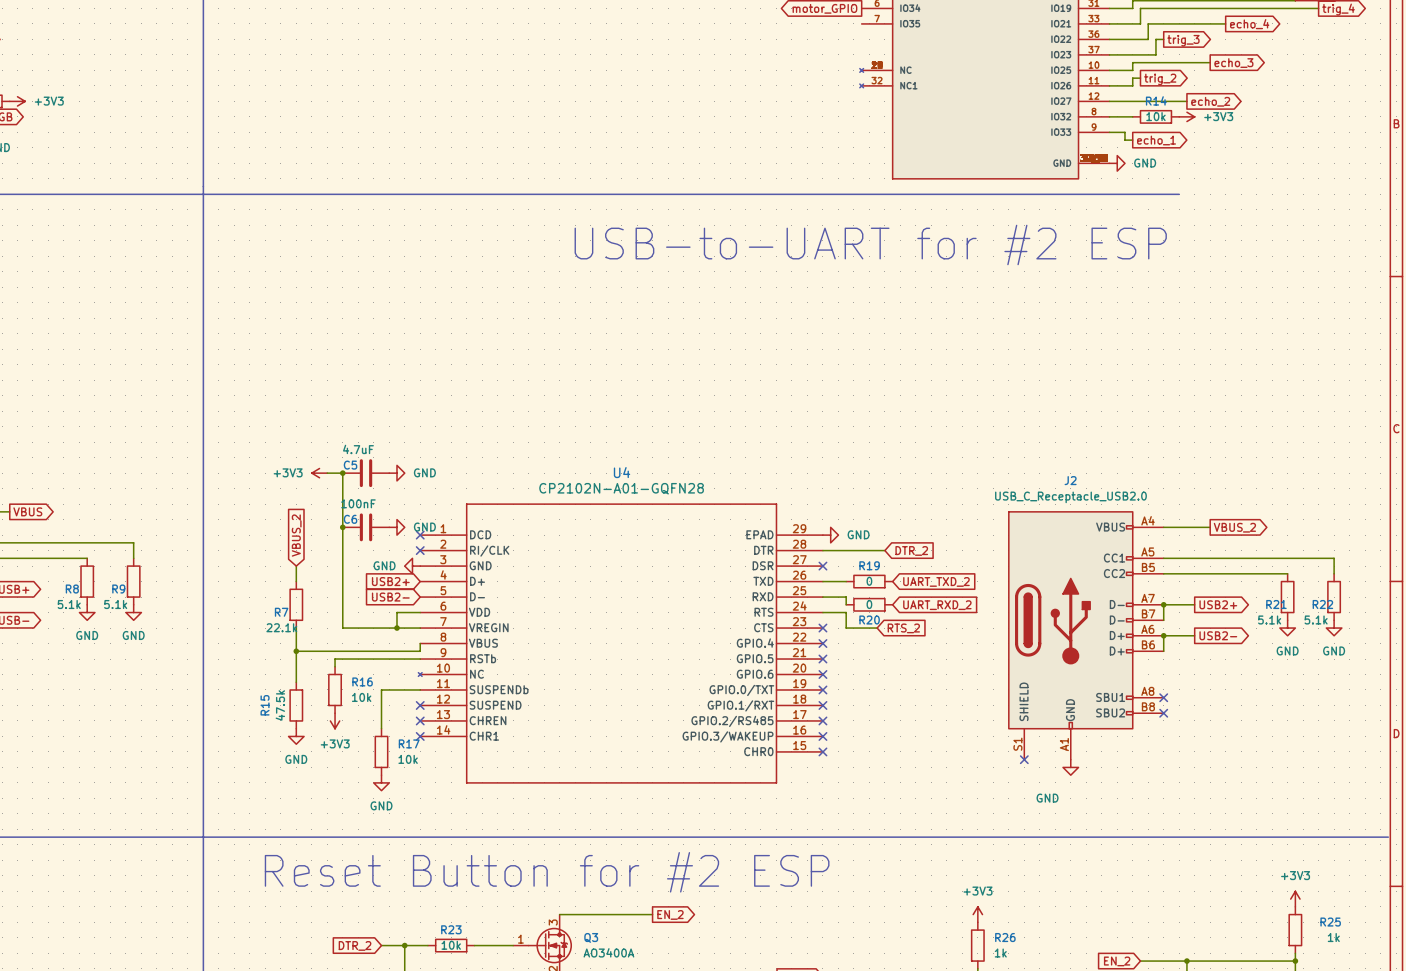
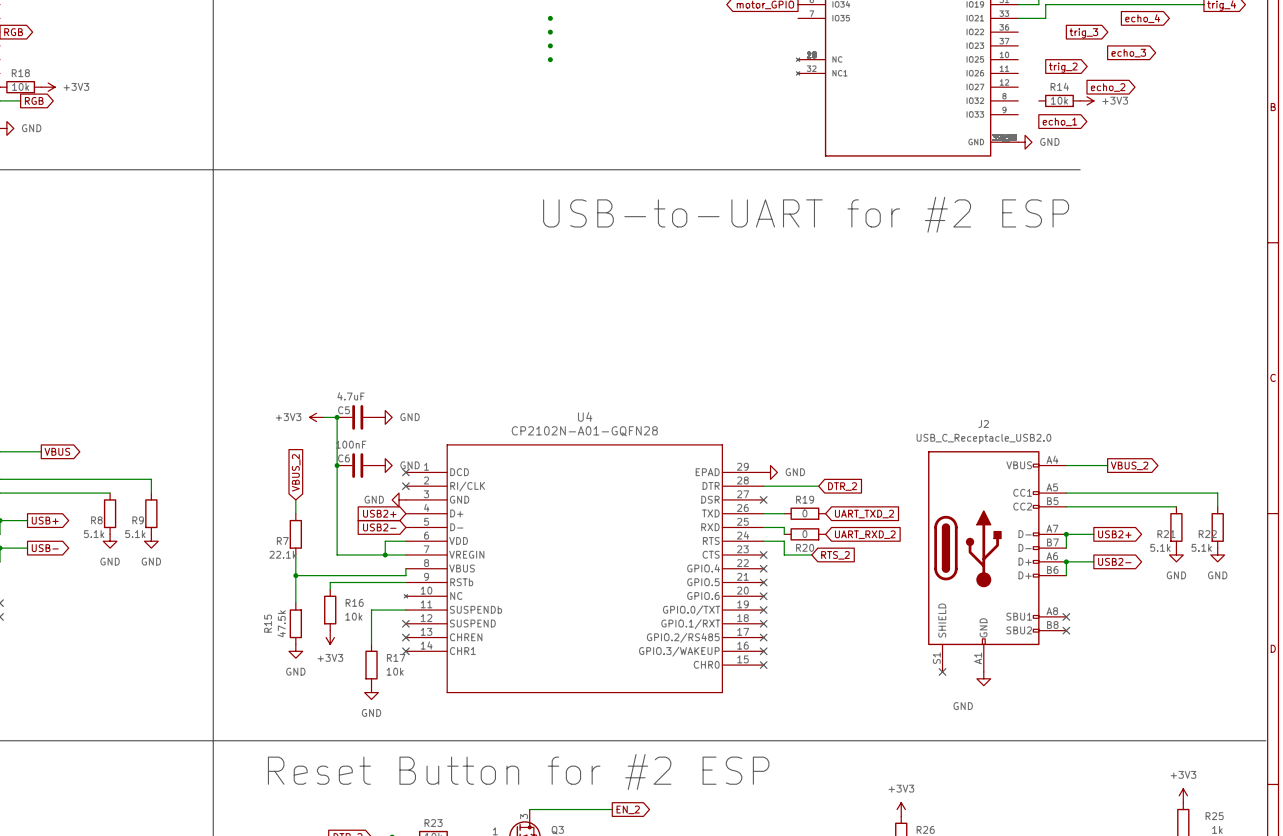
junction: none -> (550, 18)
wire: (1225, 23) (1148, 23) (1148, 39) (1109, 39) -> none
junction: none -> (550, 32)
wire: (1163, 39) (1155, 39) (1155, 54) (1109, 54) -> none
junction: none -> (550, 45)
wire: (1210, 62) (1132, 62) (1132, 70) (1109, 70) -> none
junction: none -> (550, 59)
wire: (1140, 78) (1132, 78) (1132, 85) (1109, 85) -> none
wire: (1109, 101) (1186, 101) -> none
wire: (1109, 116) (1132, 116) -> none
wire: (1109, 132) (1124, 132) (1124, 140) (1132, 140) -> none

